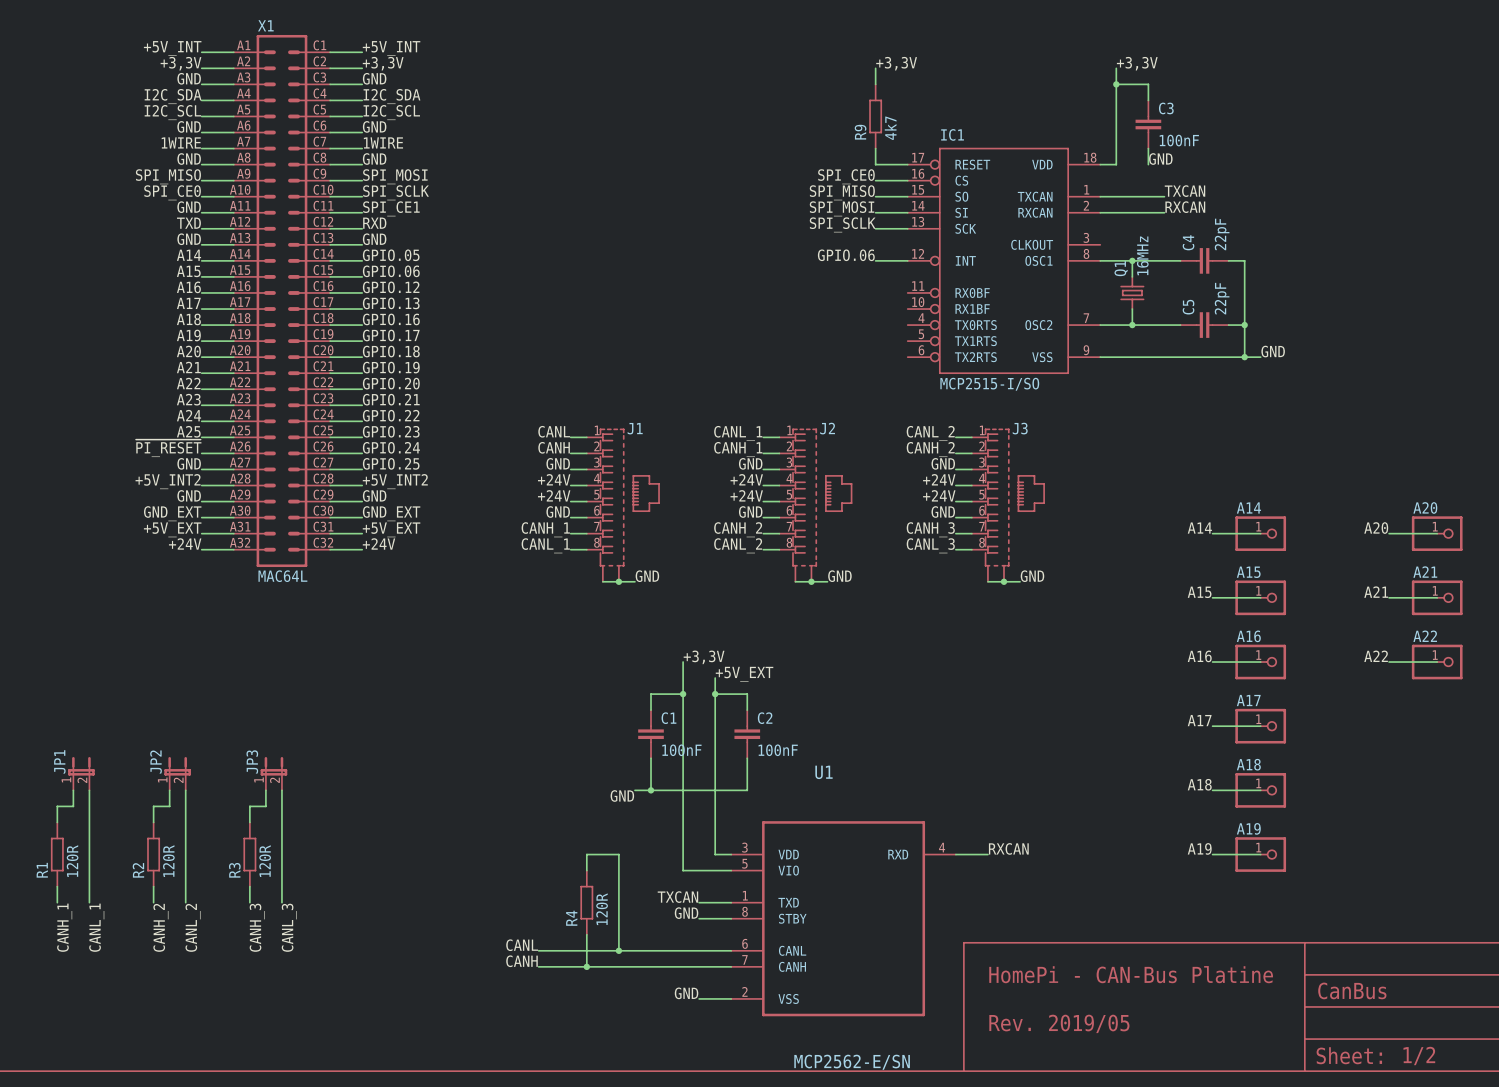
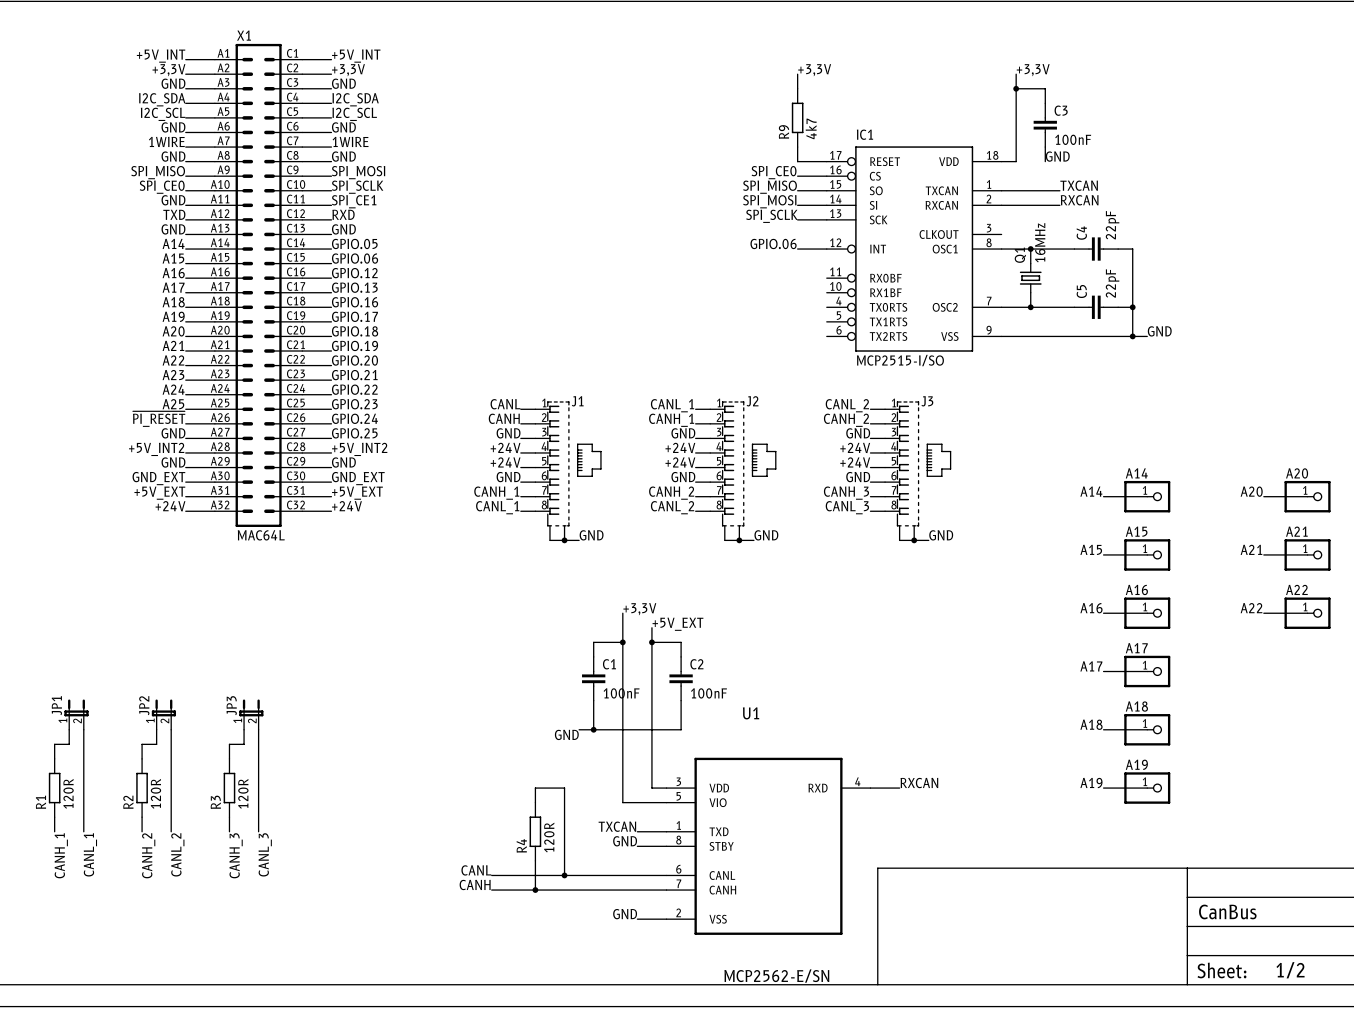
text: HomePi - CAN-Bus Platine (1131, 974) -> none
text: Rev. 2019/05 (1059, 1023) -> none

